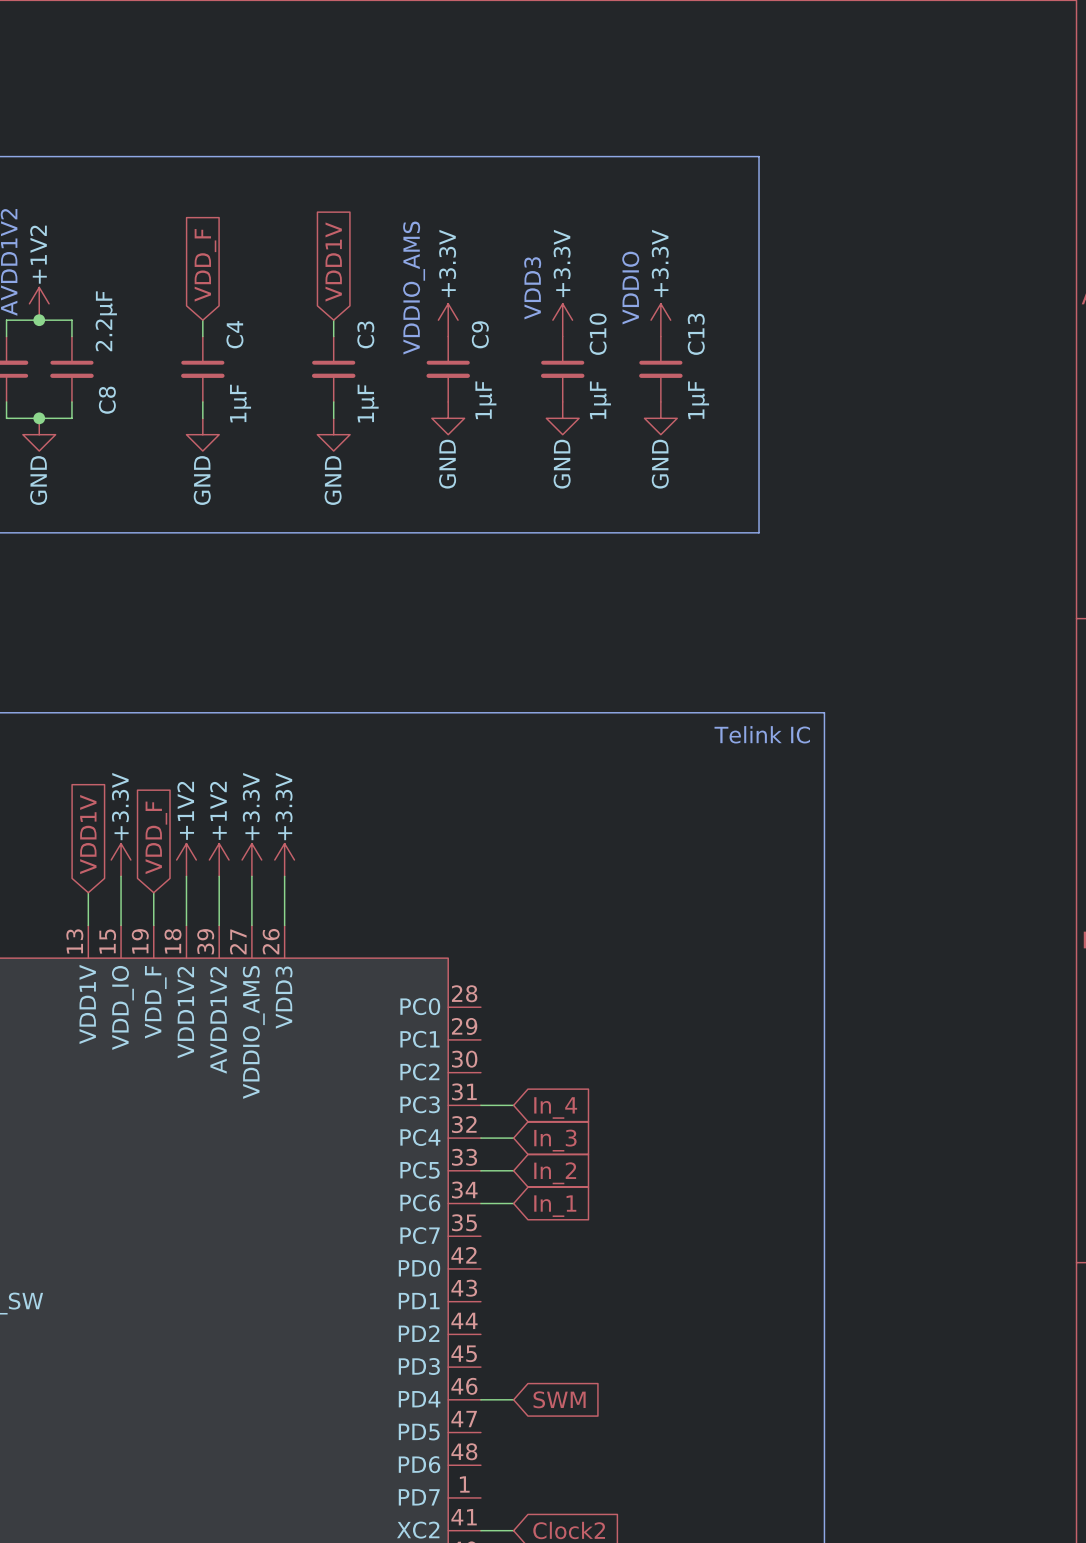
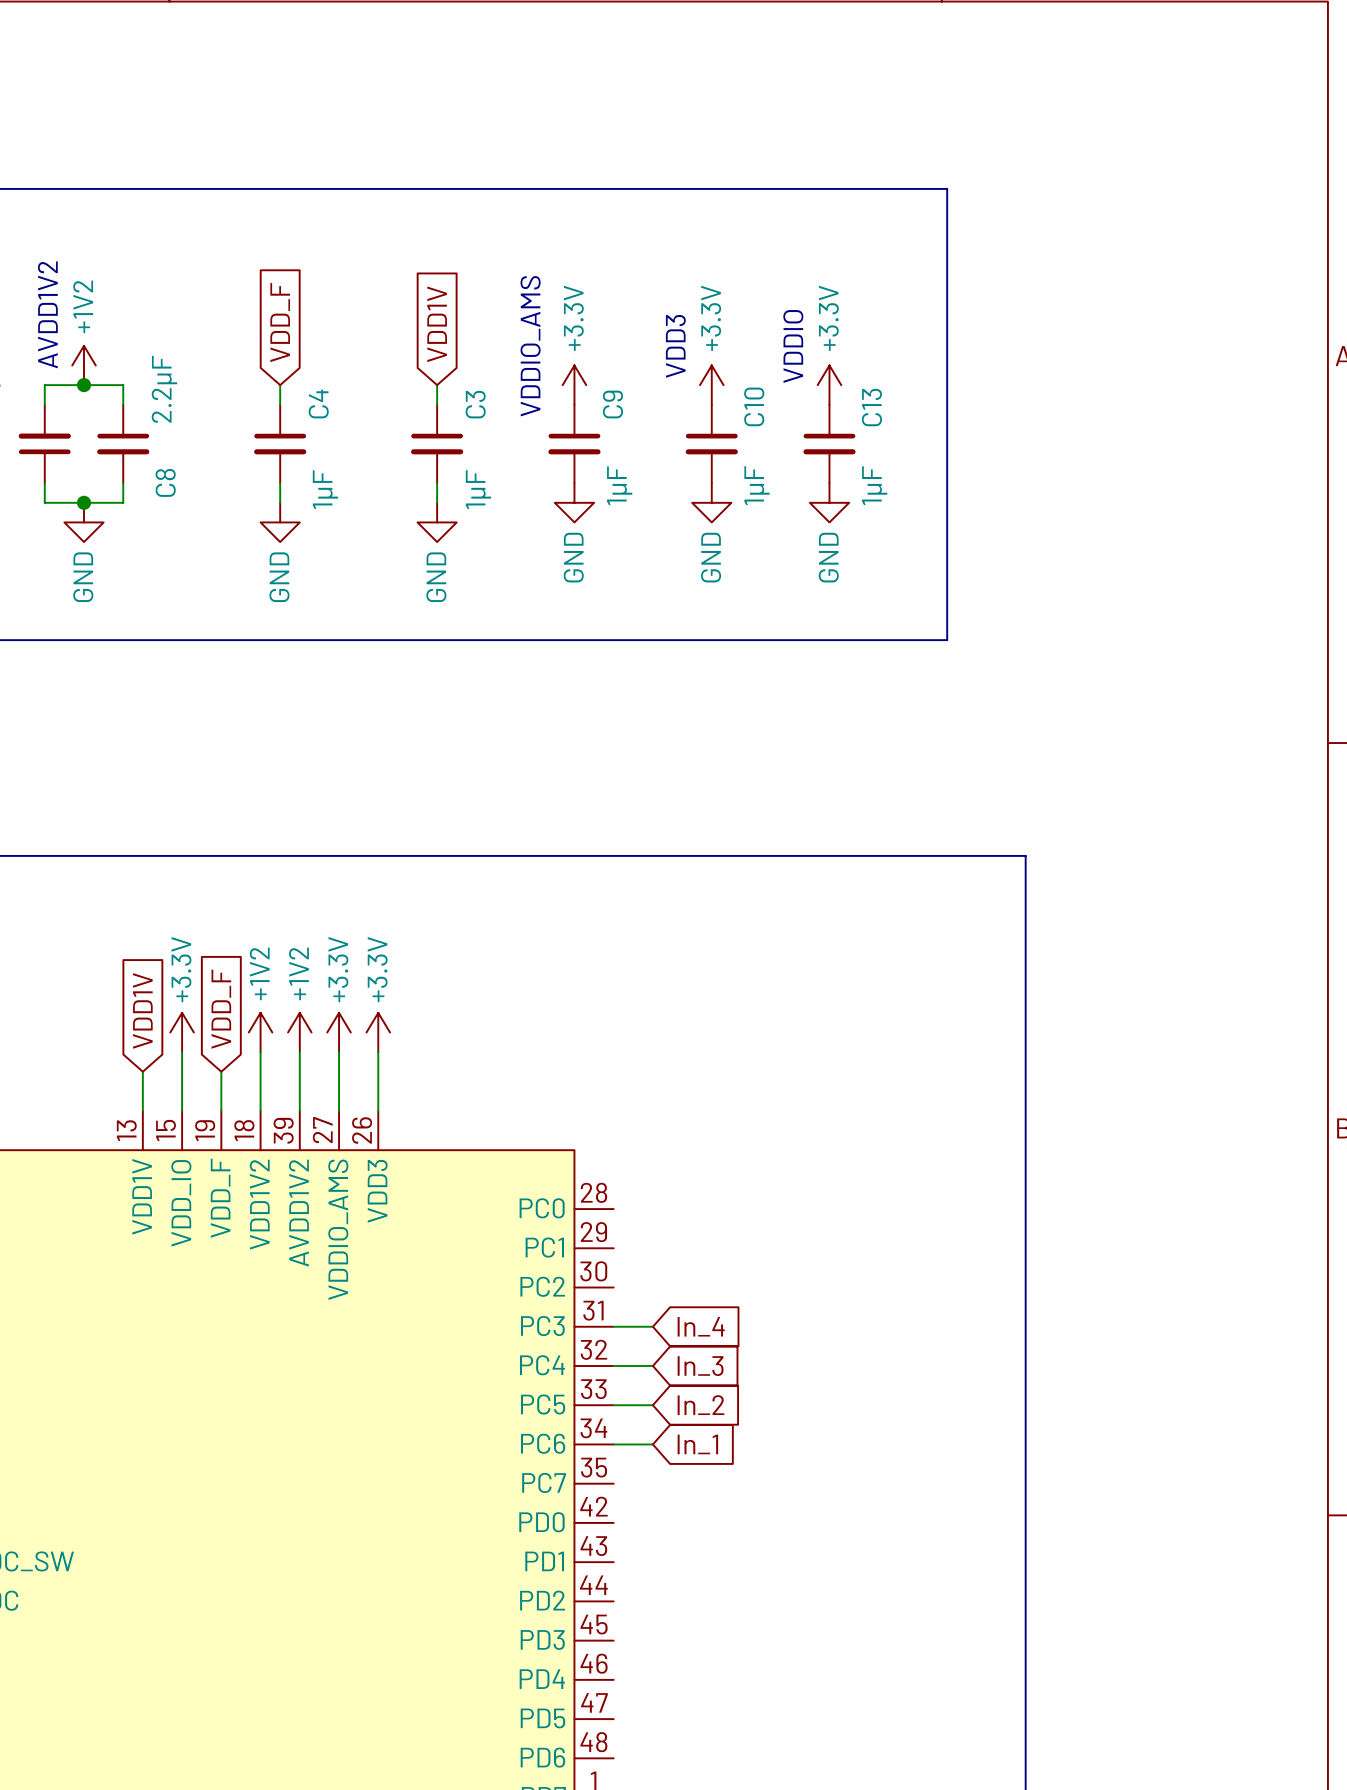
text: Telink IC (762, 734) -> none
wire: (480, 1399) (513, 1399) -> none
global label: SWM (559, 1399) -> none

